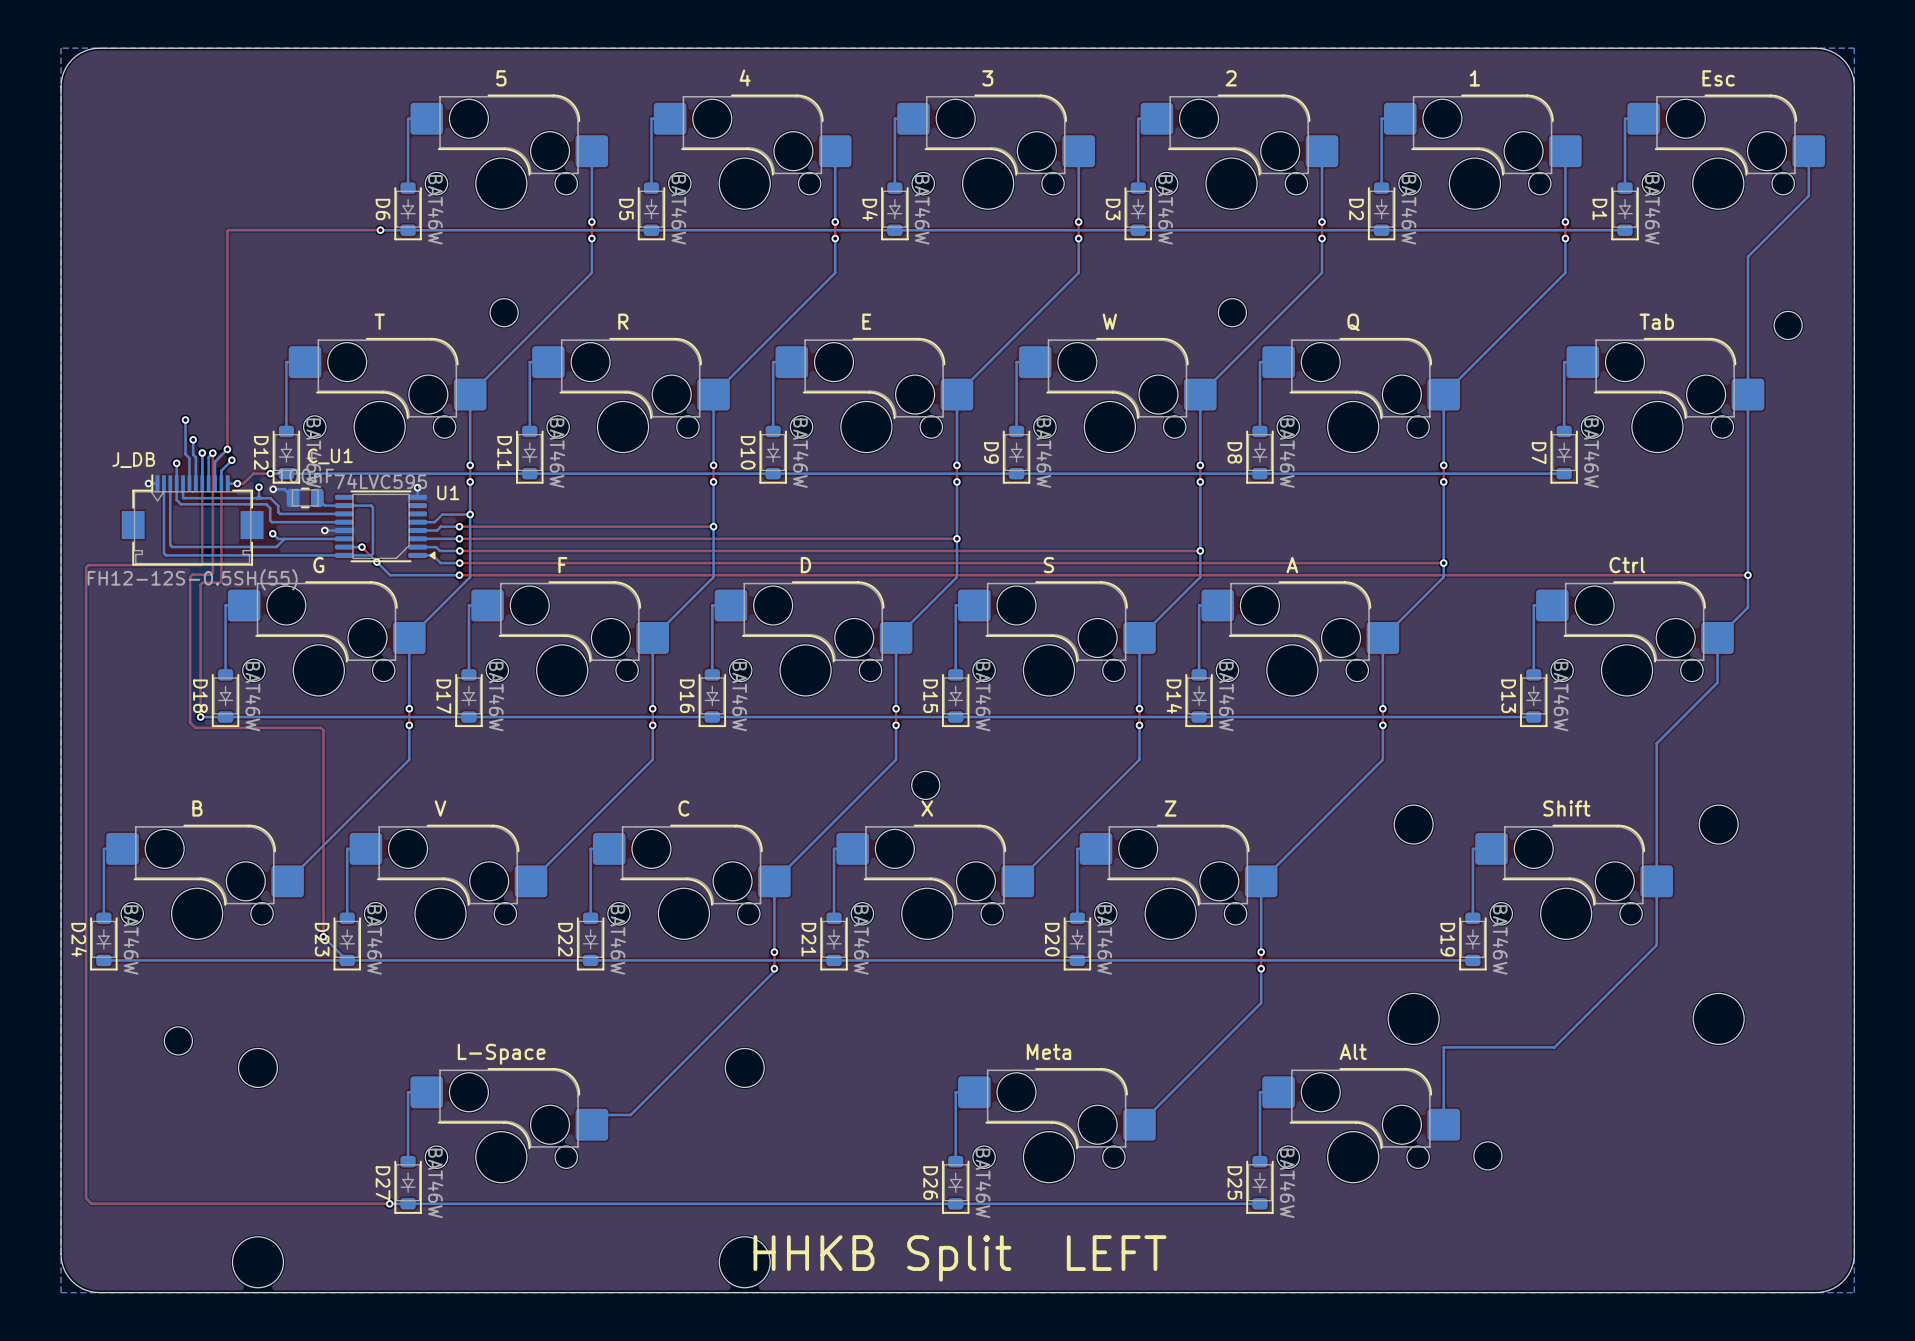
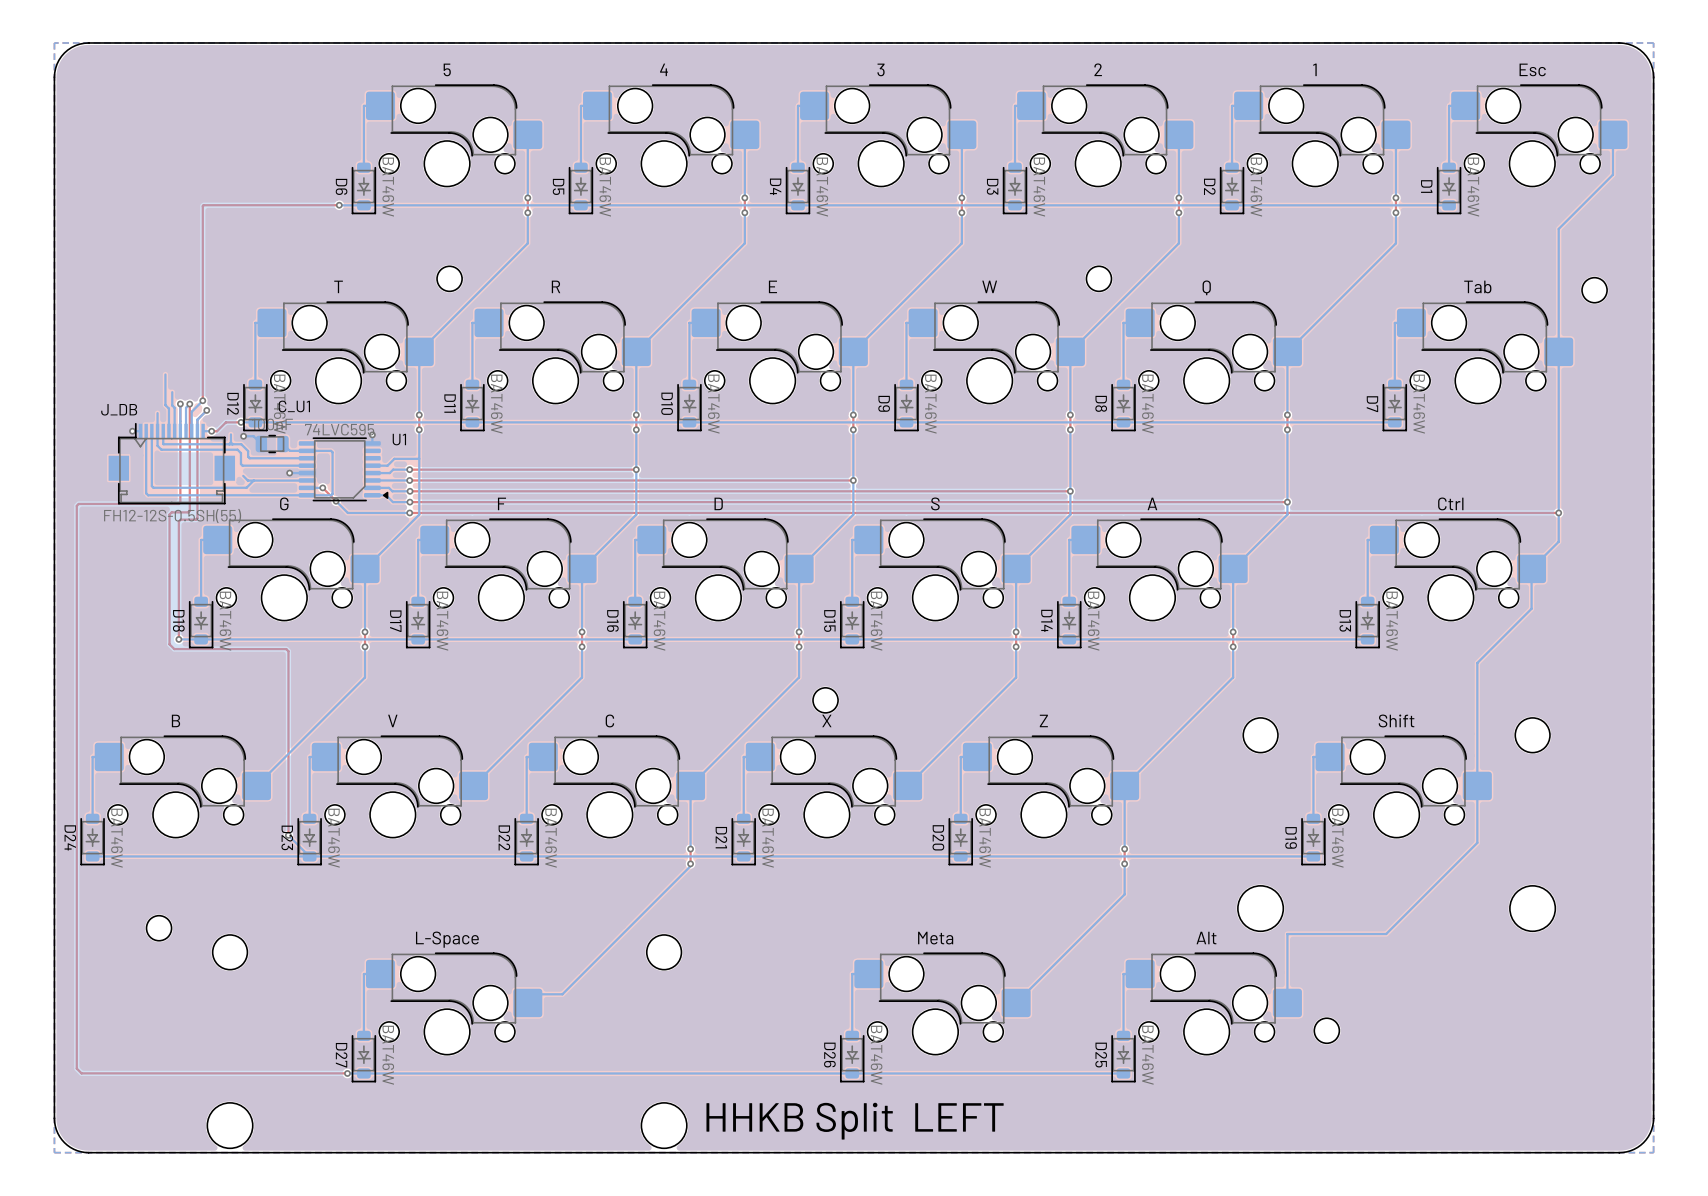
via: (185, 419) -> none
via: (193, 439) -> none
via: (176, 463) -> none
via: (258, 487) -> none
via: (470, 514) -> none
via: (272, 533) -> none

